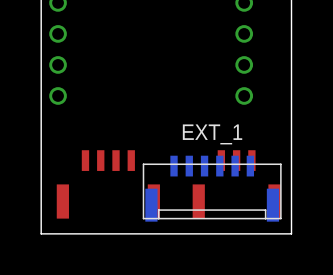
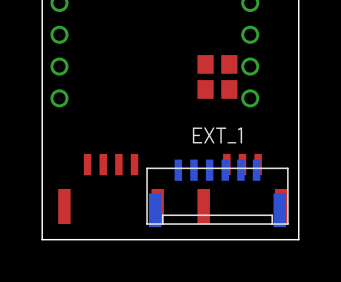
part: none -> (217, 64)
part: none -> (217, 89)

